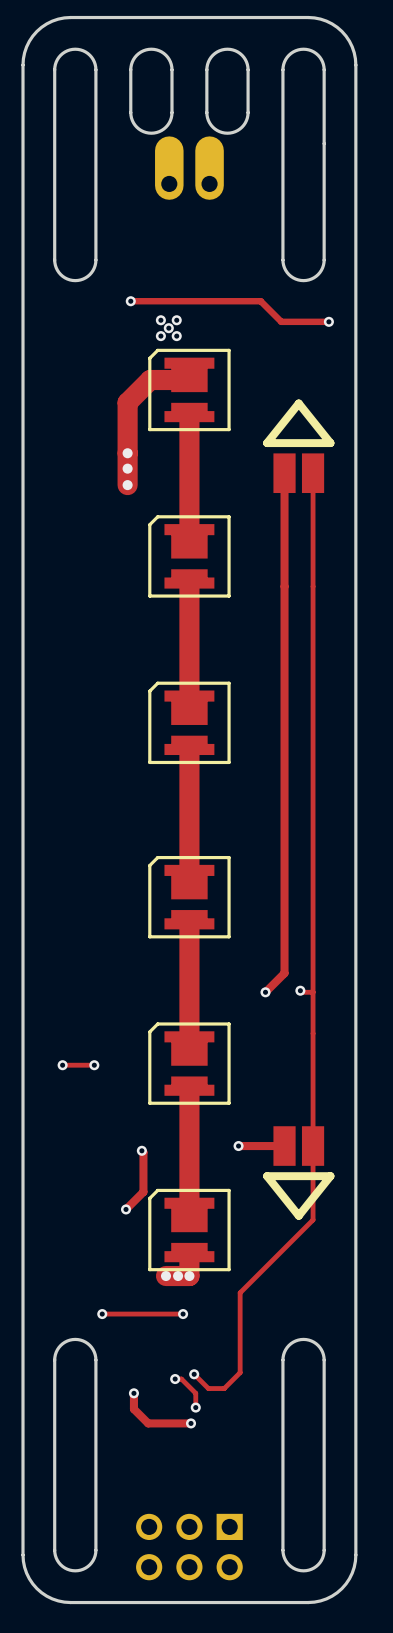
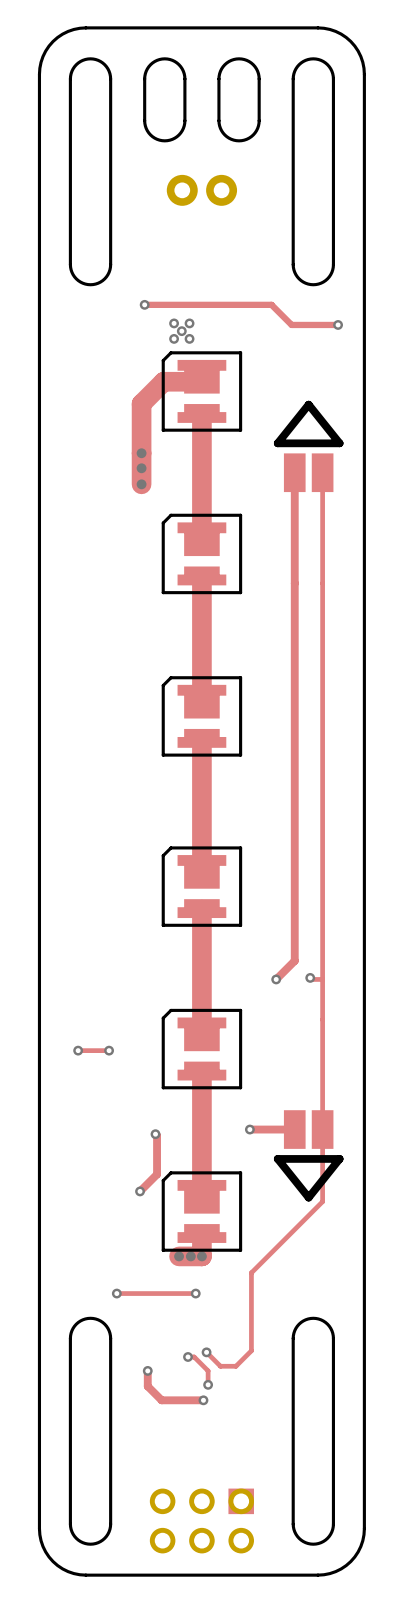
part footprint: [155, 136, 224, 200] -> [166, 174, 238, 206]
part footprint: [136, 1513, 243, 1581] -> [149, 1488, 254, 1554]

